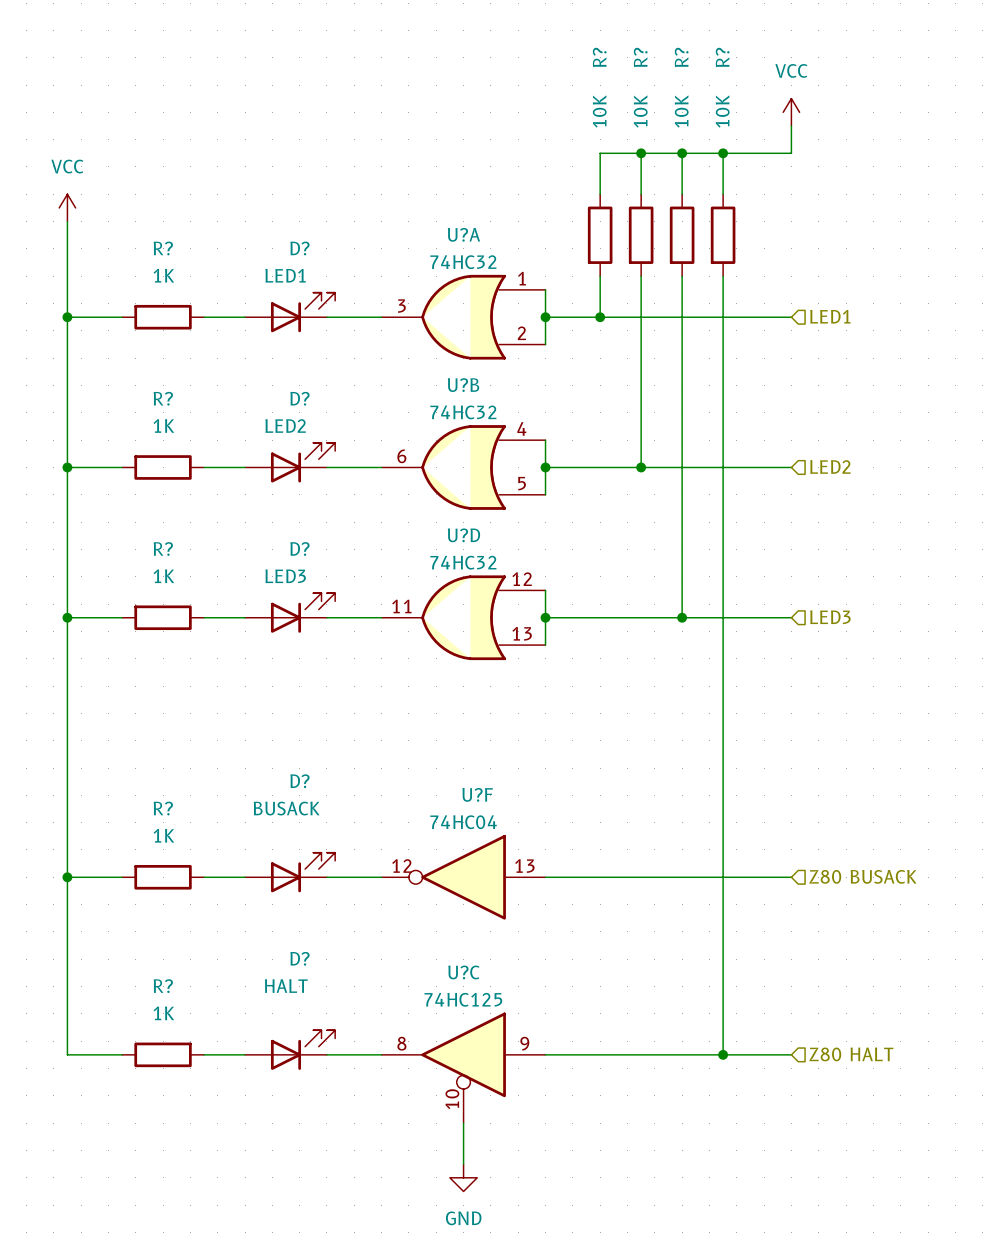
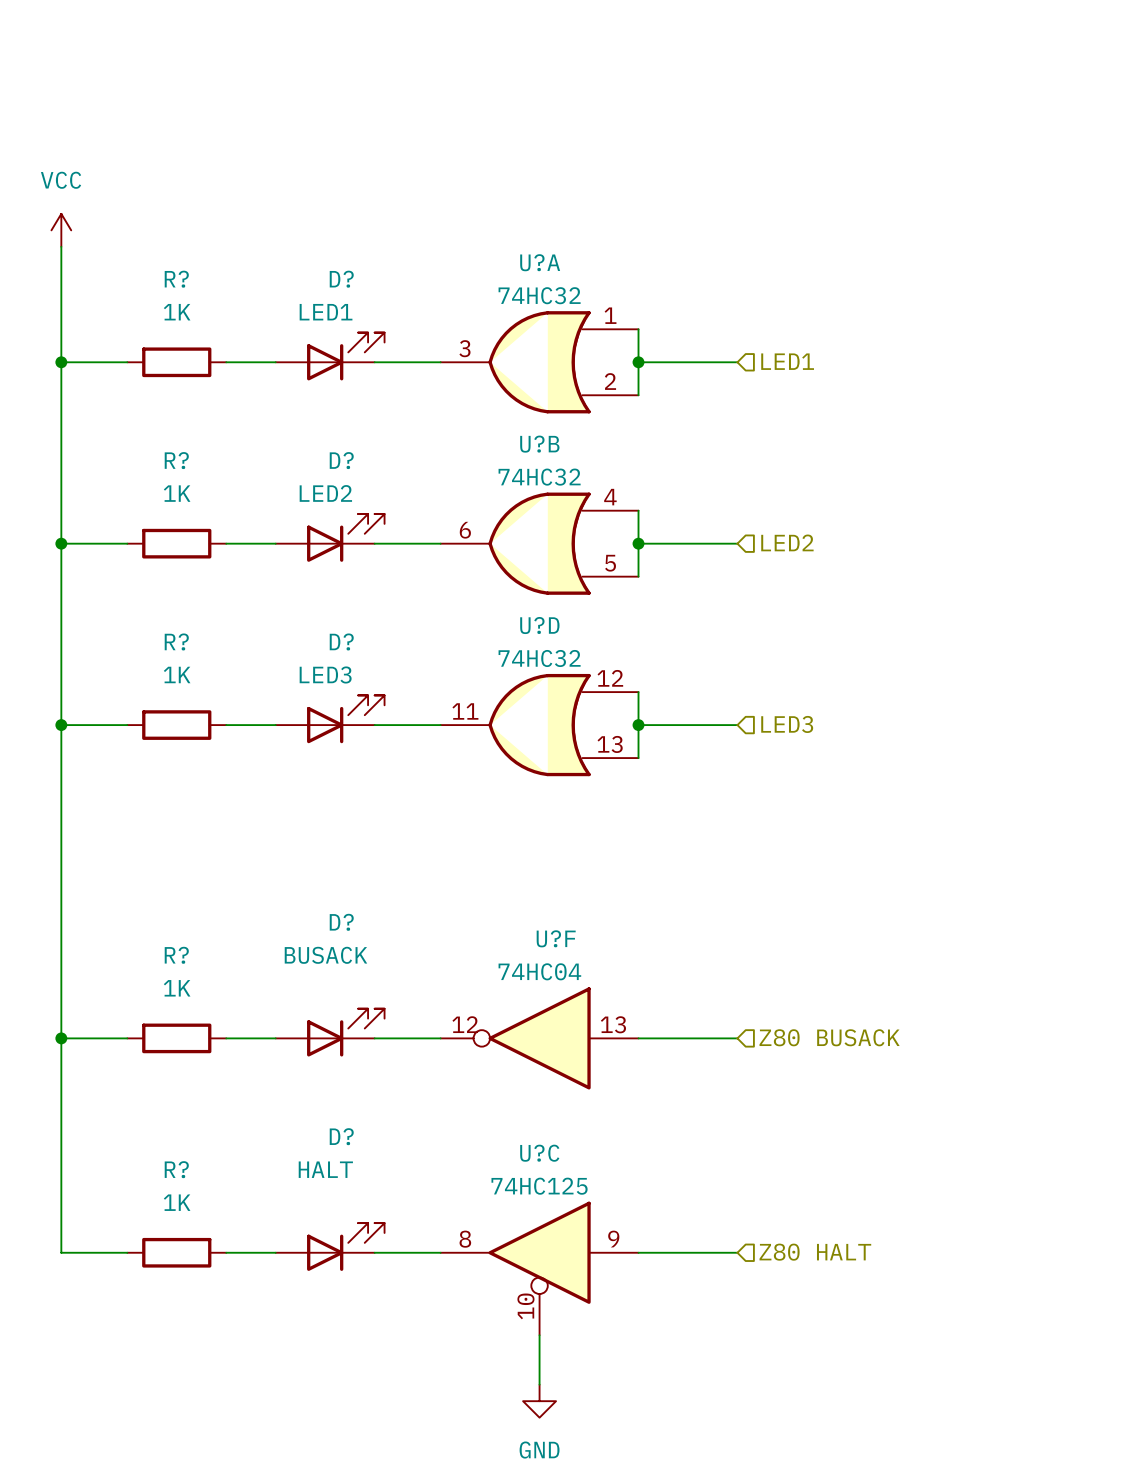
power symbol: VCC (791, 112) -> none
wire: (791, 125) (791, 153) (600, 153) (600, 194) -> none
wire: (641, 153) (641, 194) -> none
junction: (641, 153) -> none
wire: (682, 153) (682, 194) -> none
junction: (682, 153) -> none
wire: (723, 153) (723, 194) -> none
junction: (723, 153) -> none
R?: 10K (600, 235) -> none
R?: 10K (641, 235) -> none
R?: 10K (682, 235) -> none
R?: 10K (723, 235) -> none
wire: (600, 276) (600, 317) -> none
wire: (641, 276) (641, 467) -> none
wire: (682, 276) (682, 617) -> none
wire: (723, 276) (723, 1054) -> none
hierarchical label position: LED1 (830, 316) -> LED1 (787, 361)
junction: (600, 317) -> none
wire: (627, 317) (791, 317) -> none
hierarchical label position: LED2 (830, 466) -> LED2 (787, 542)
wire: (627, 467) (791, 467) -> none
junction: (641, 467) -> none
wire: (627, 617) (791, 617) -> none
junction: (682, 617) -> none
hierarchical label position: LED3 (830, 617) -> LED3 (787, 724)
hierarchical label position: Z80 BUSACK (862, 876) -> Z80 BUSACK (829, 1037)
wire: (627, 877) (791, 877) -> none
wire: (627, 1054) (791, 1054) -> none
junction: (723, 1054) -> none
hierarchical label position: Z80 HALT (851, 1054) -> Z80 HALT (815, 1252)

